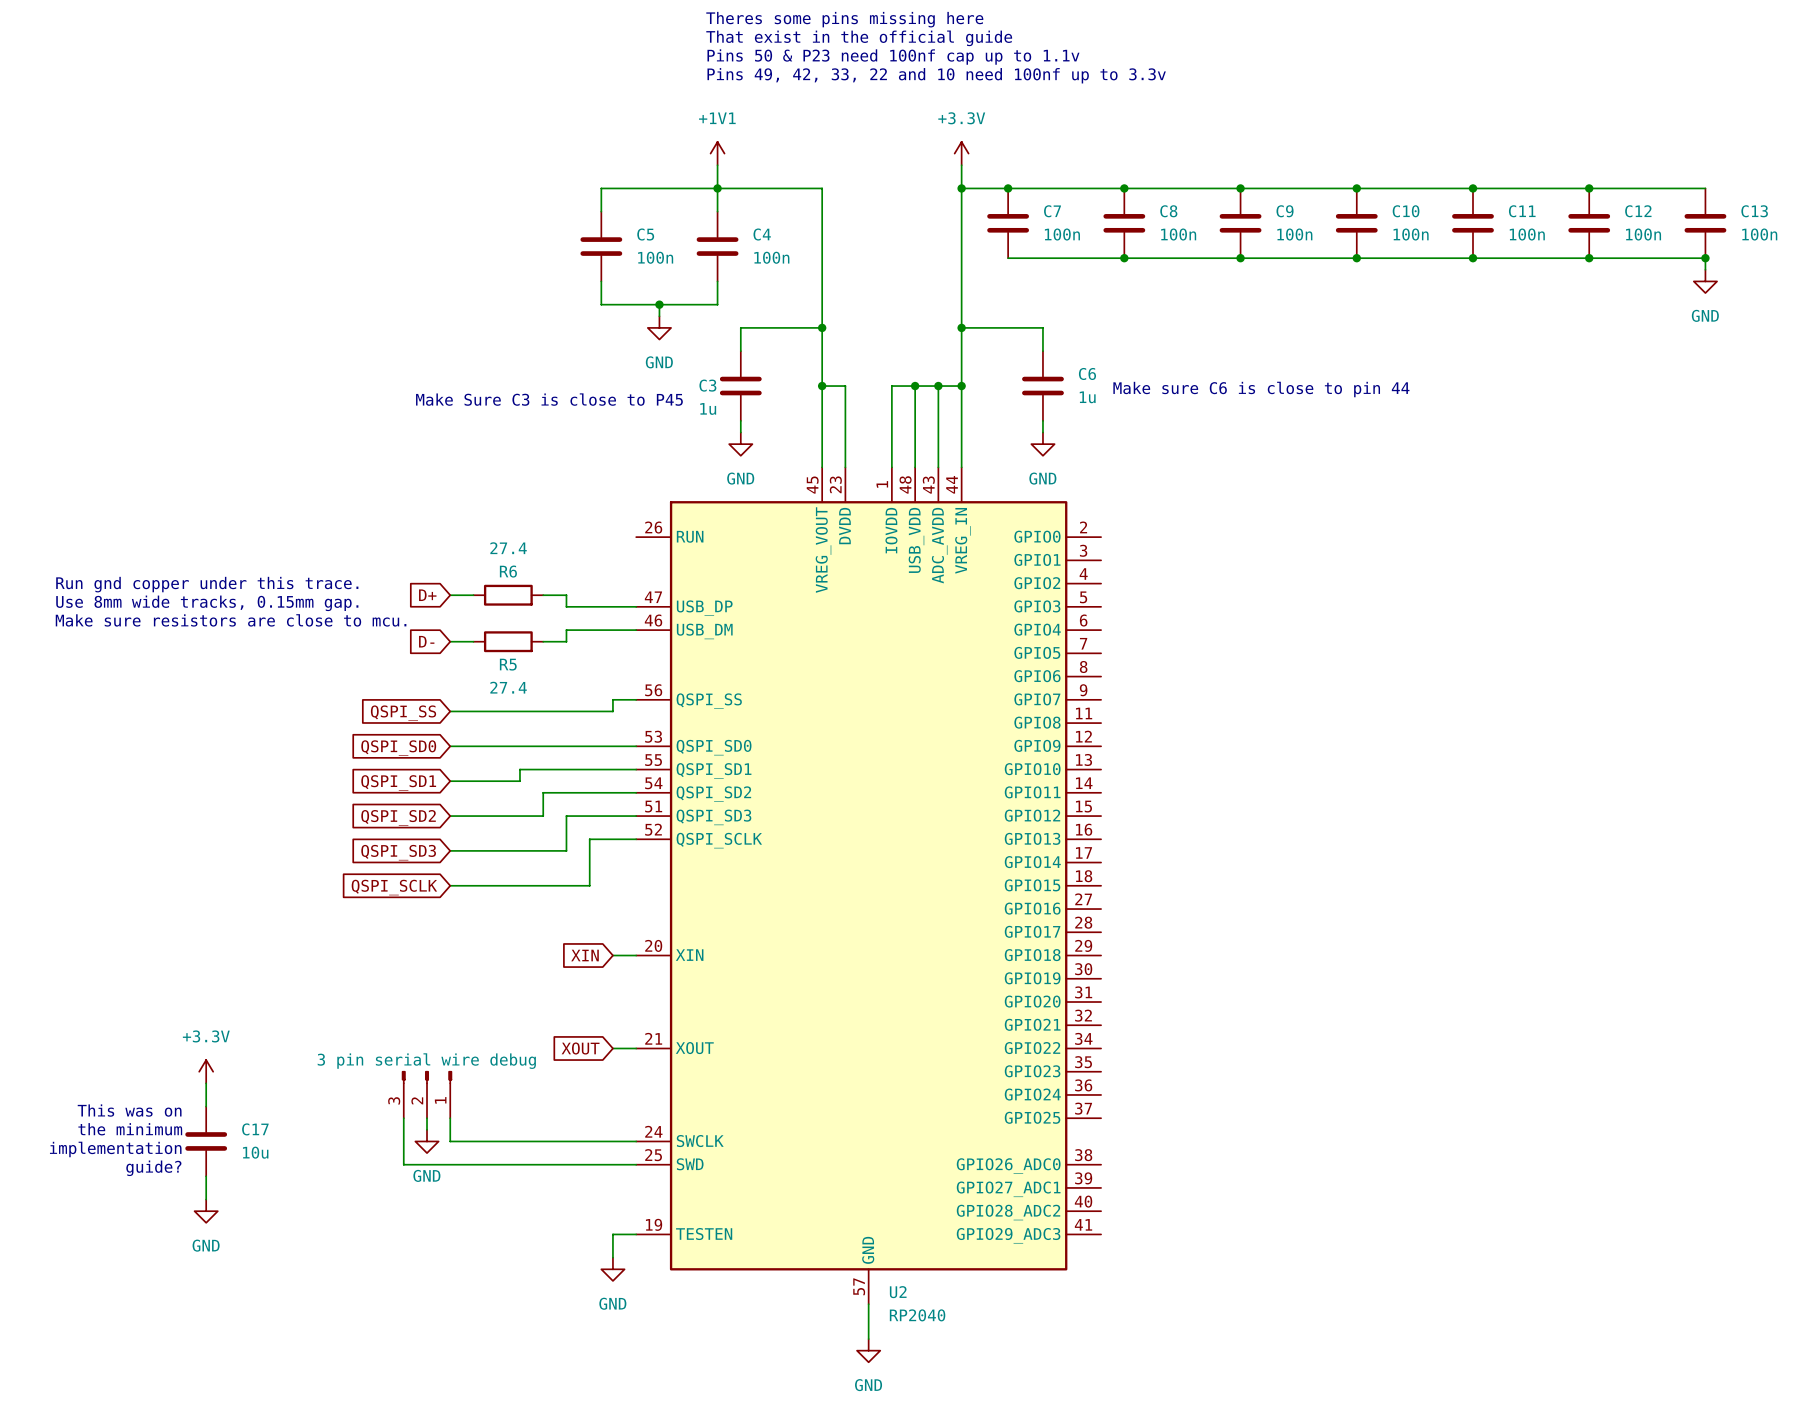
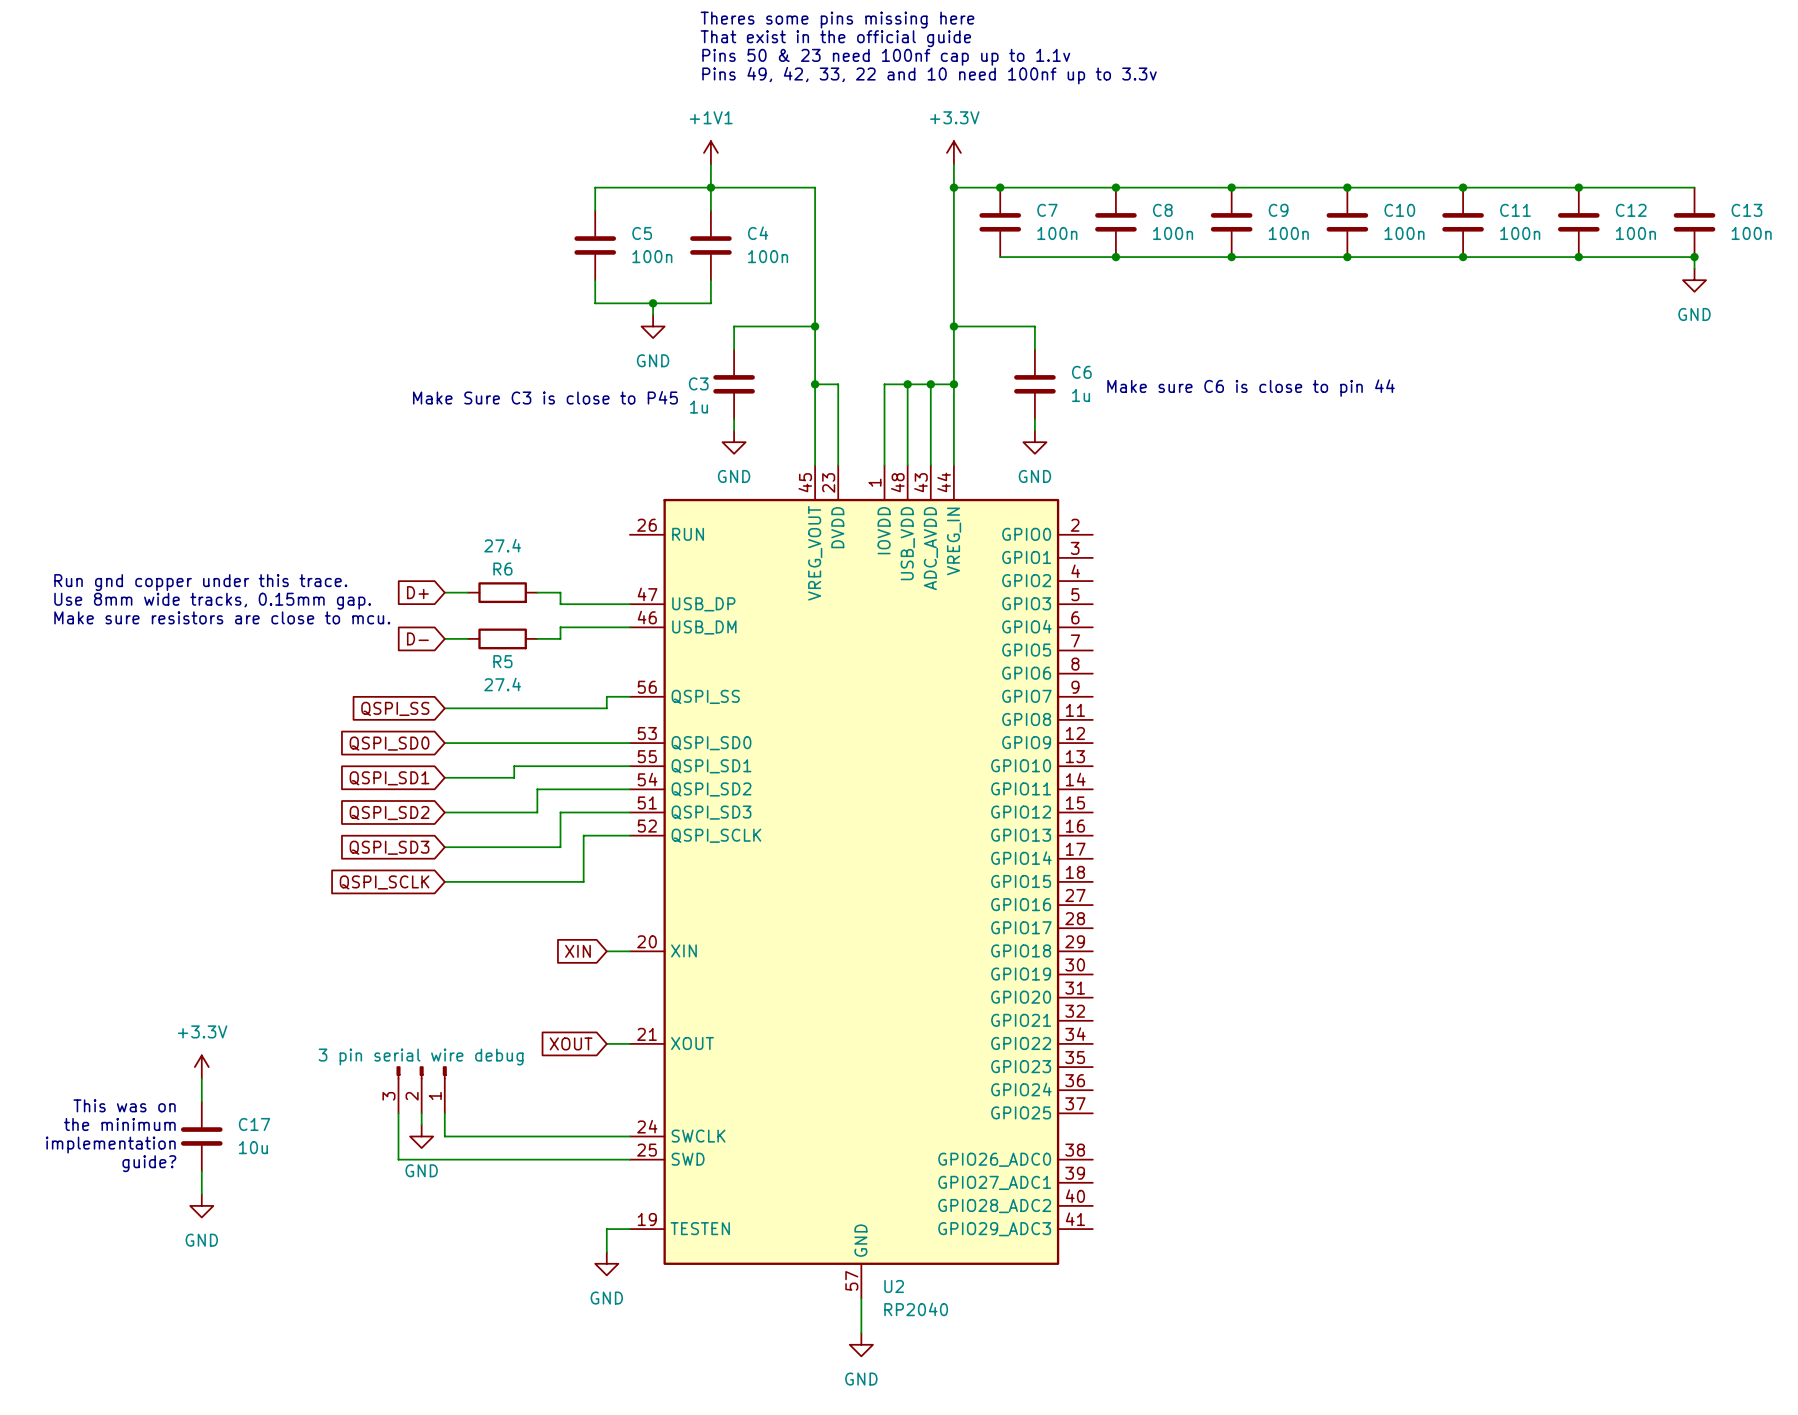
text: Pins 50 & P23 need 100nf cap up to 1.1v (893, 57) -> Pins 50 & 23 need 100nf cap up to 1.1v (886, 57)

